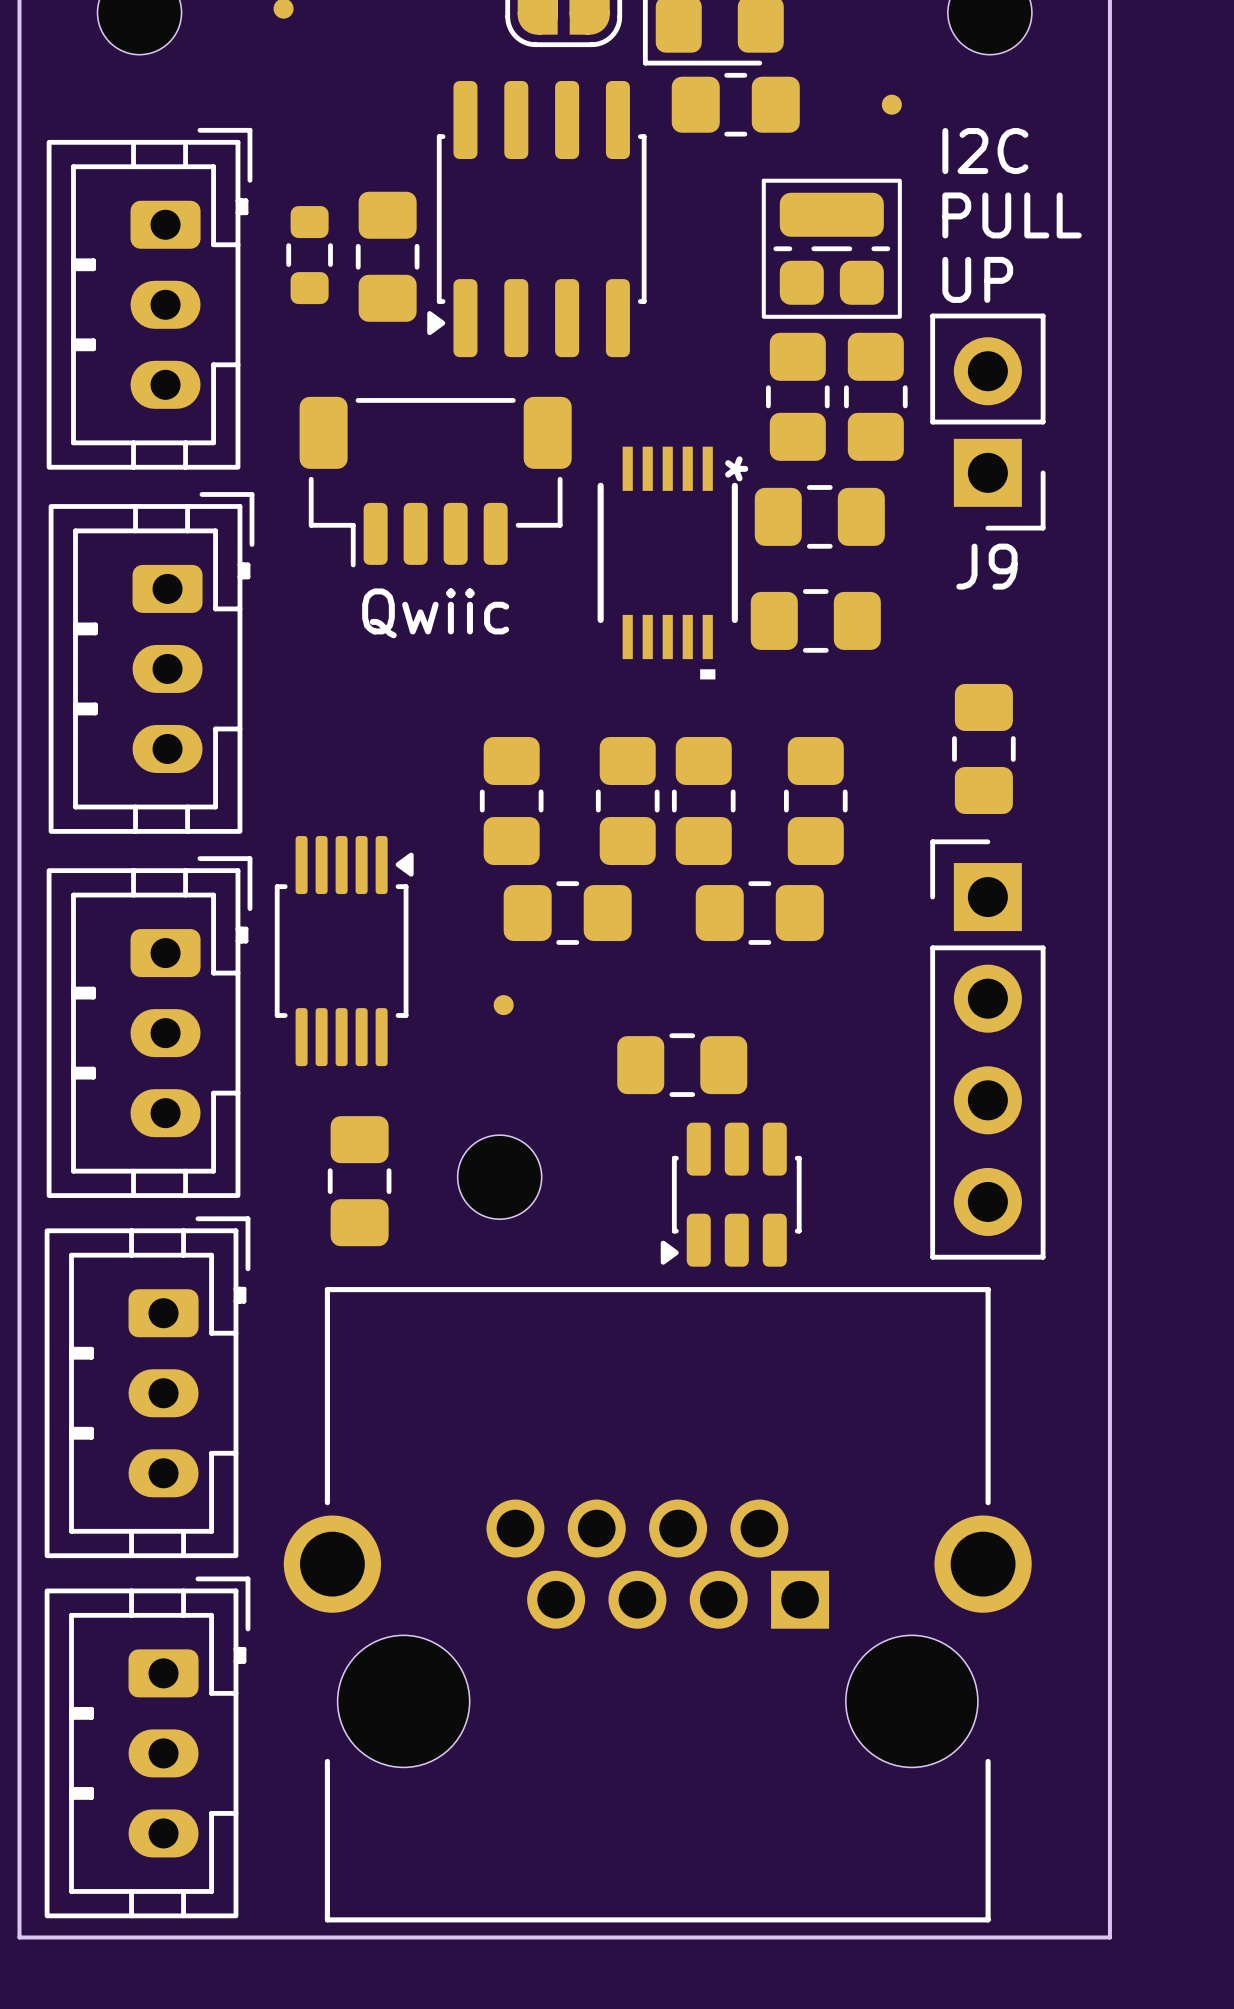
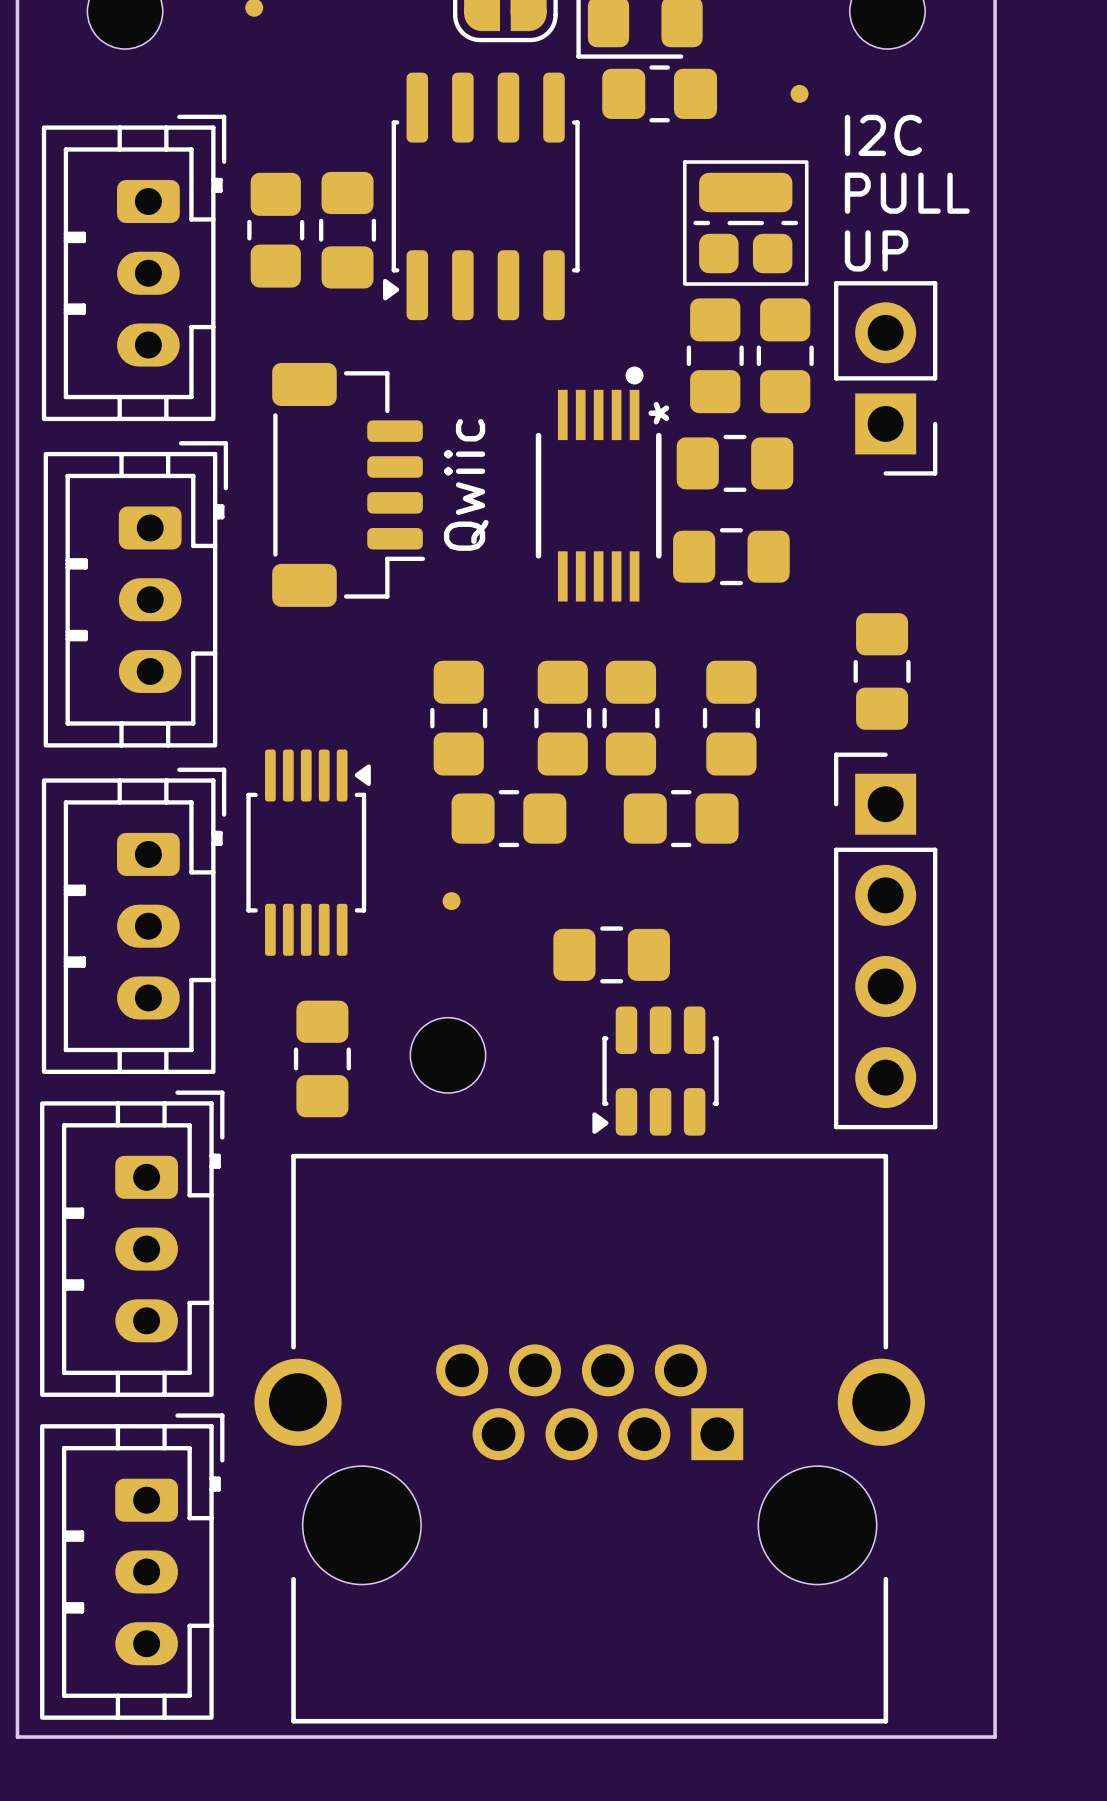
part footprint: [286, 206, 333, 305] -> [247, 172, 305, 288]
part footprint: [597, 446, 738, 680] -> [535, 366, 662, 602]
part rotation: 0° (435, 482) -> 90° counterclockwise (348, 484)
J9 name: J9 (986, 566) -> none

